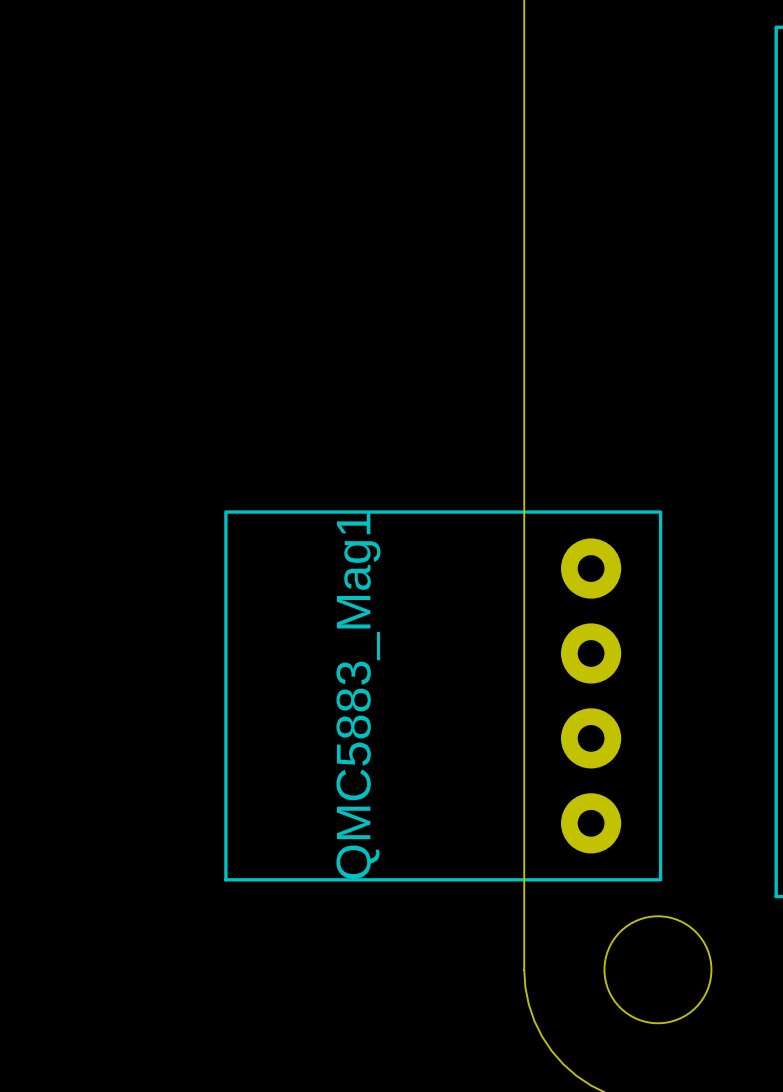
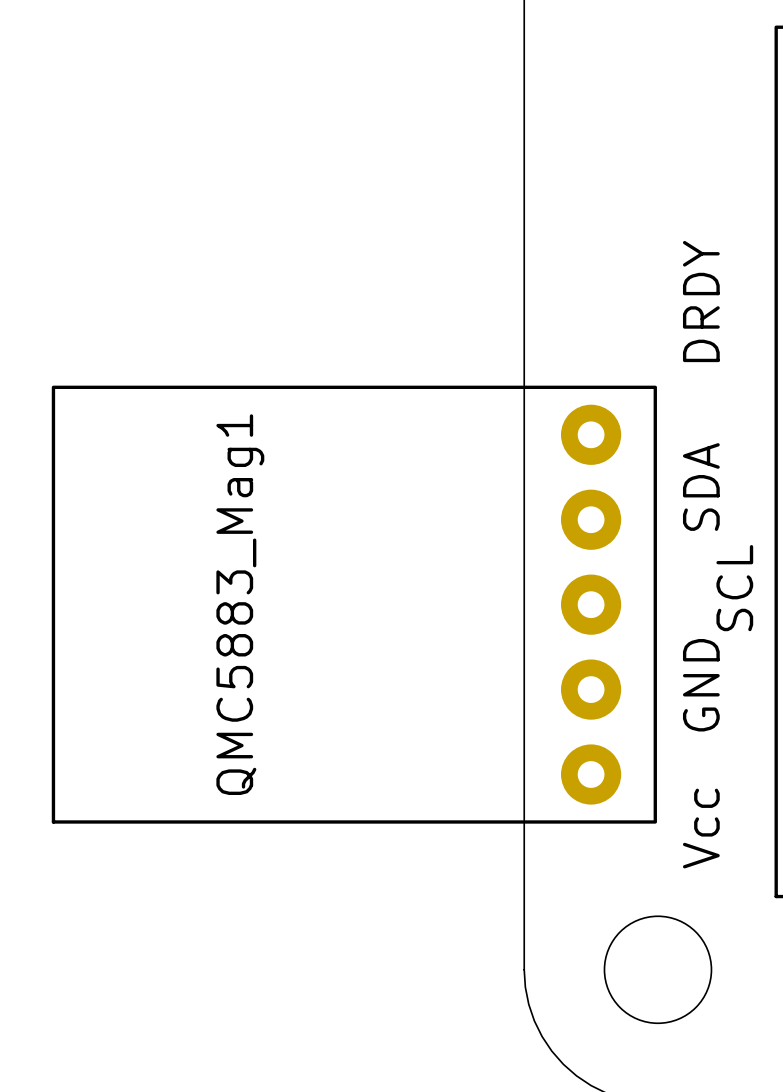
QMC5883_Mag1 footprint: [224, 510, 663, 882] -> [51, 385, 657, 824]

